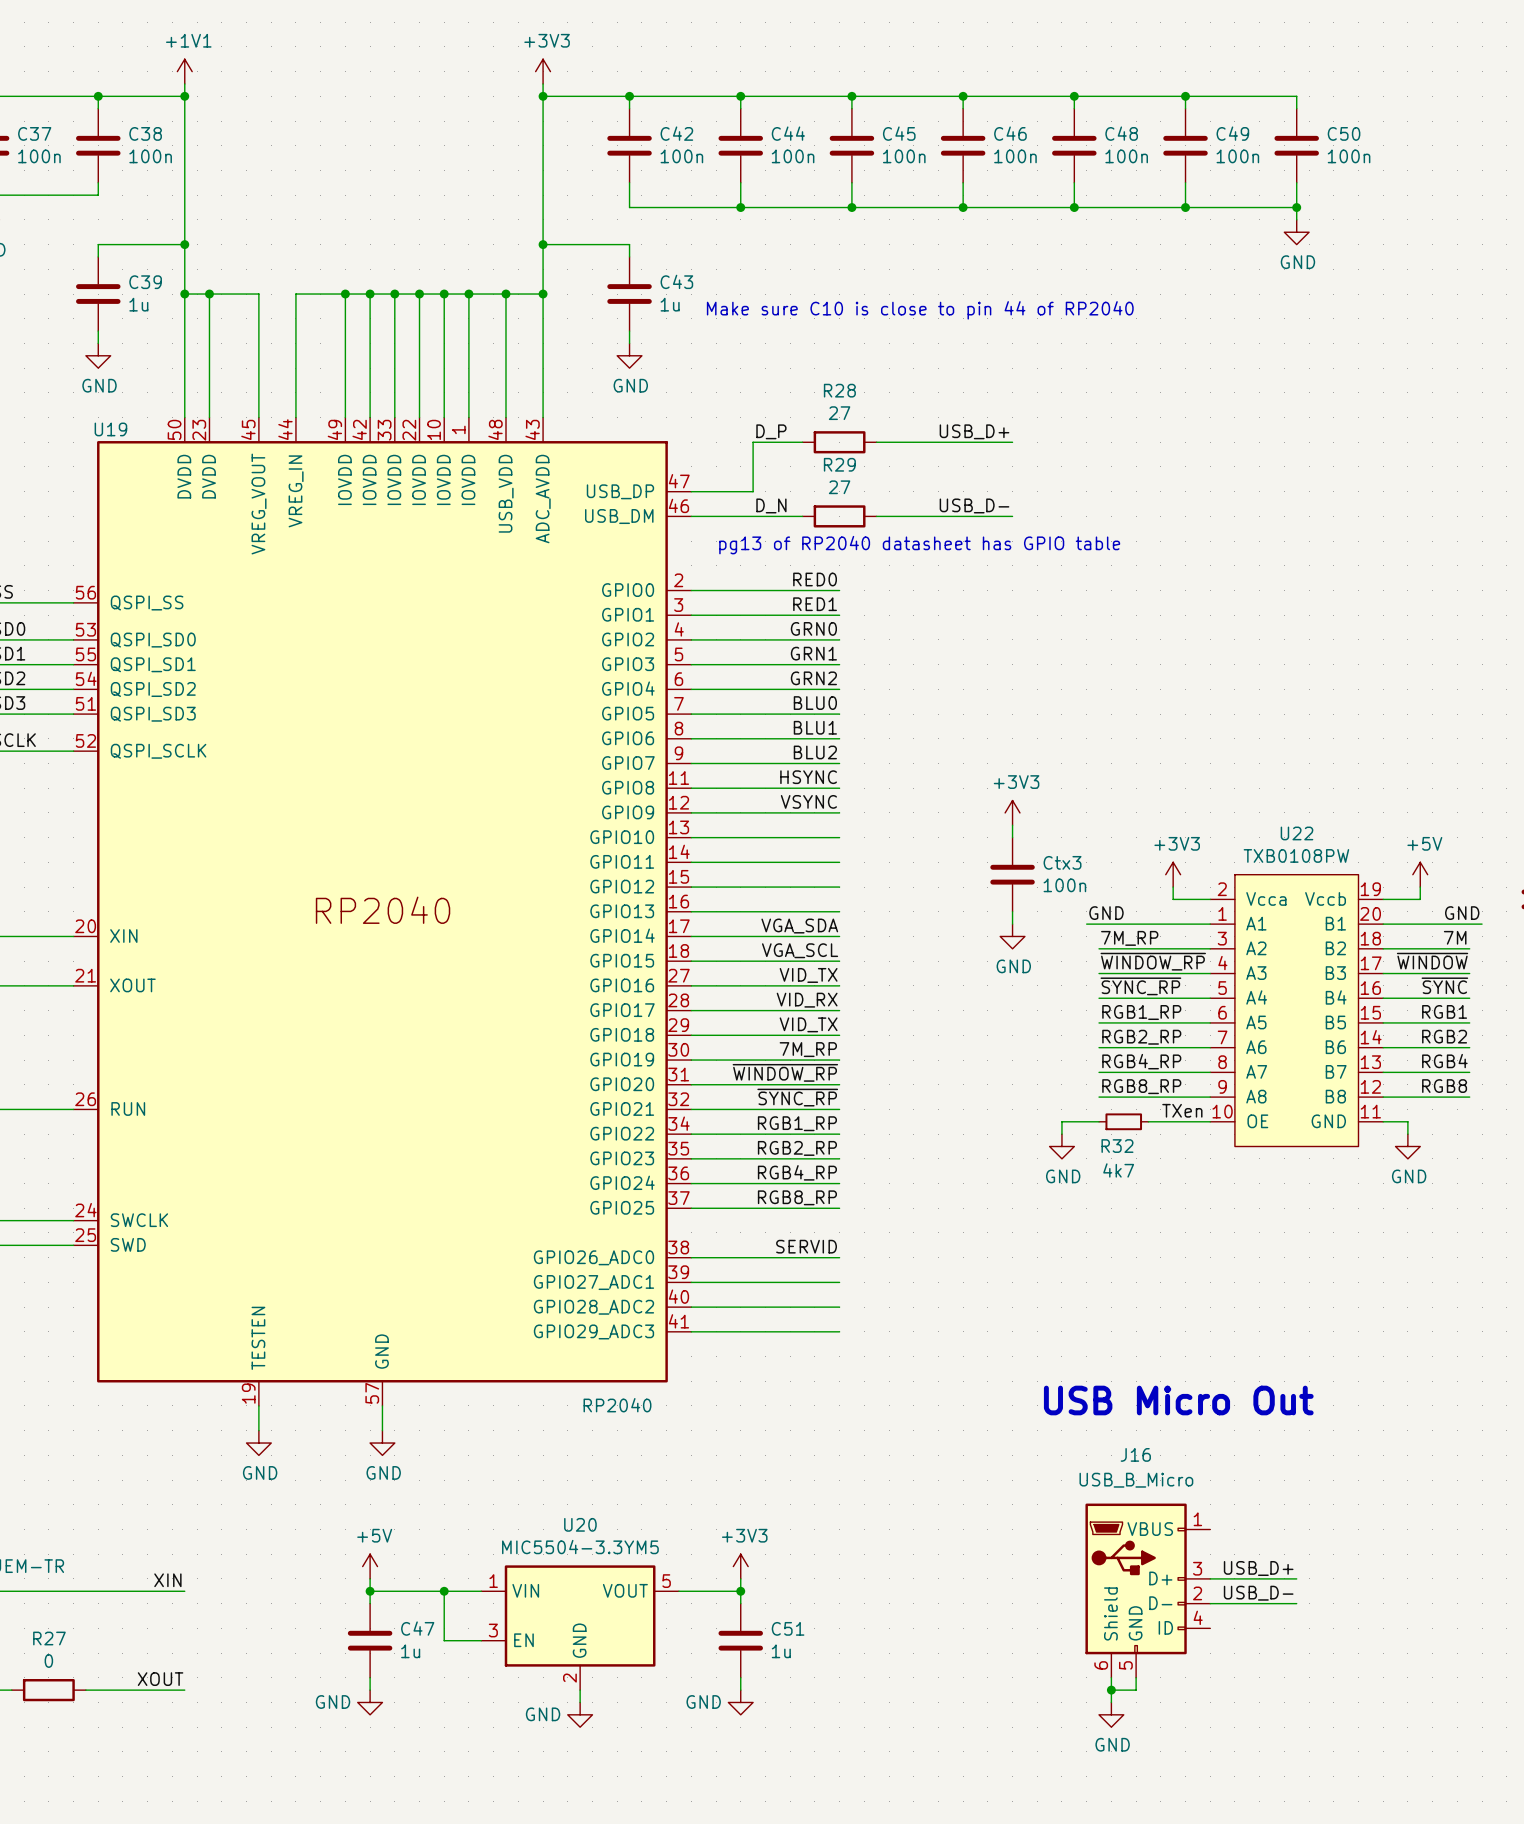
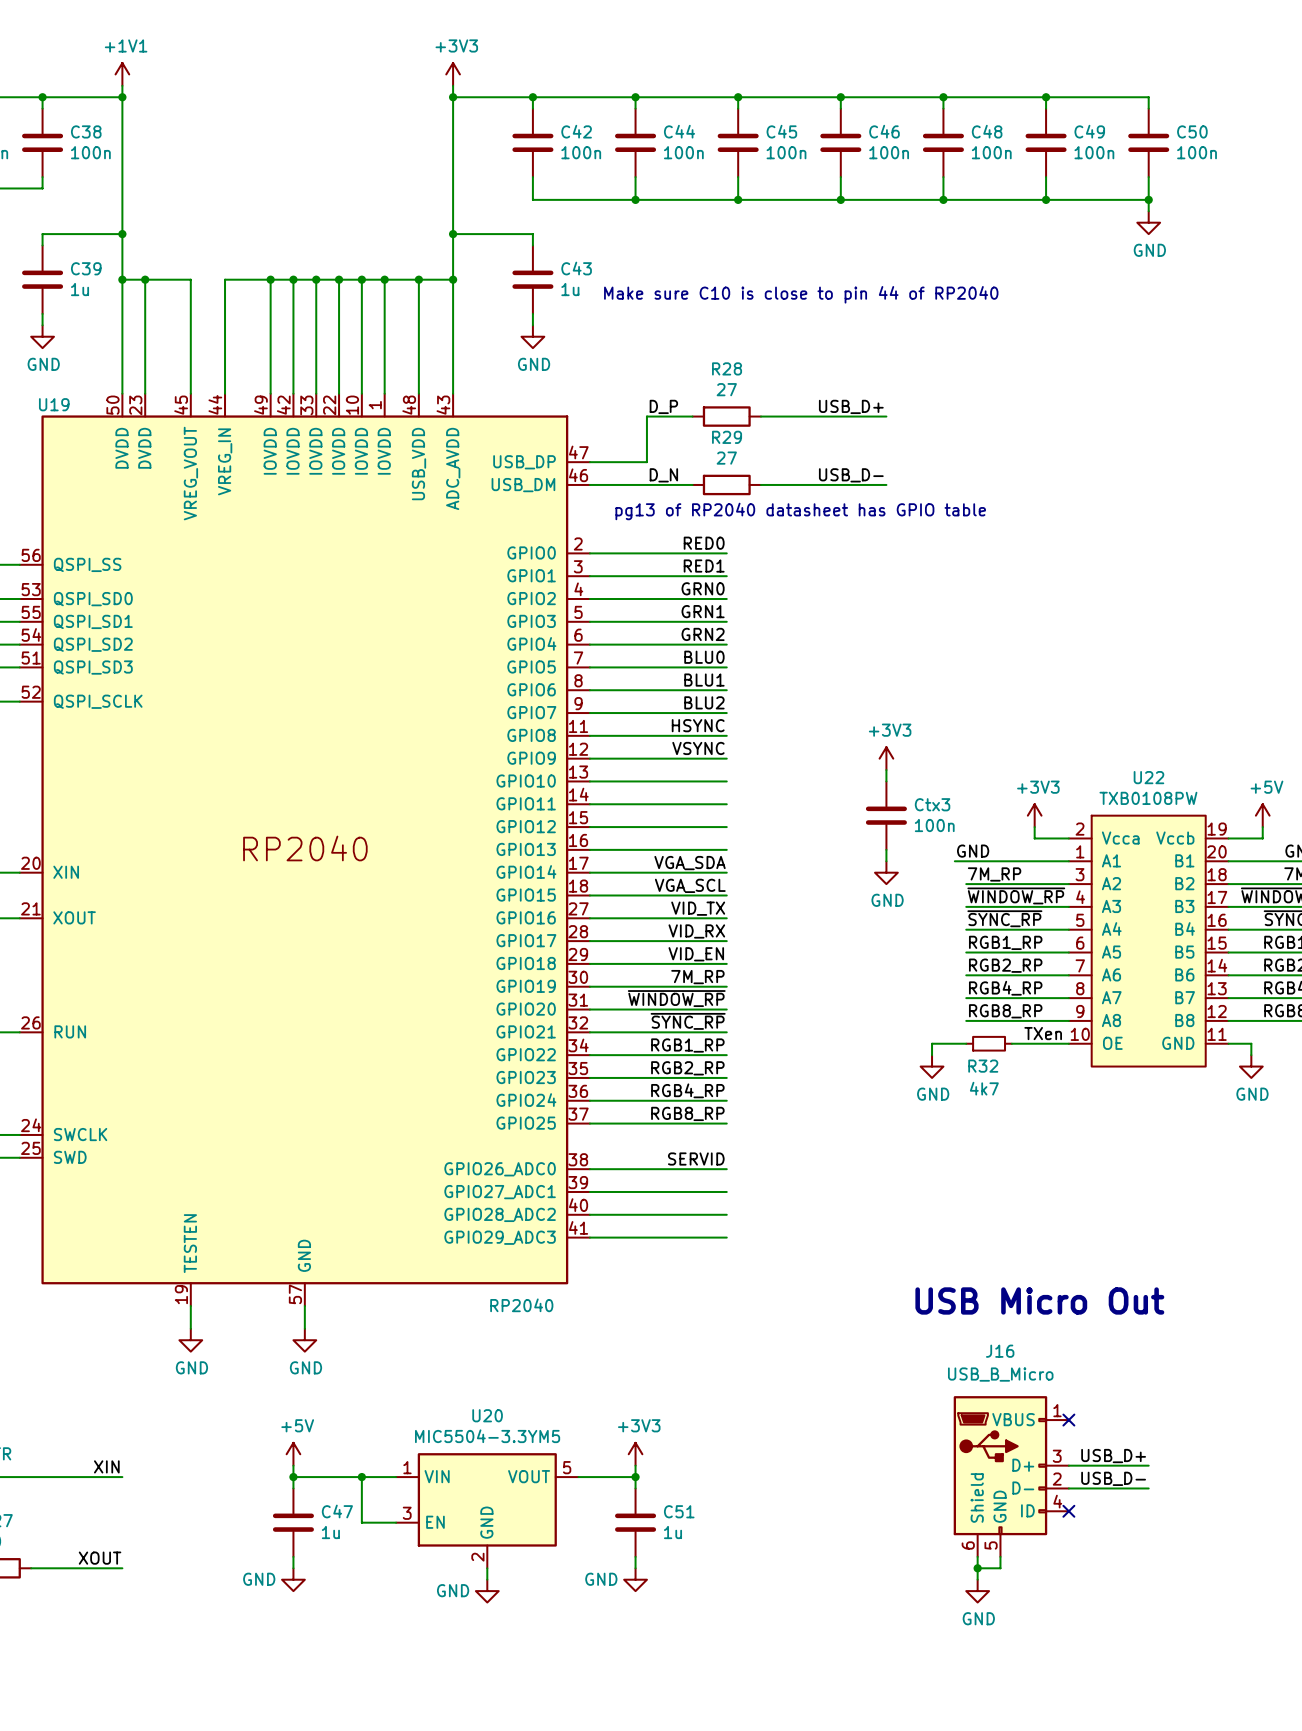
label: VID_TX (808, 1024) -> VID_EN (696, 954)
no-connect mark: none -> (1068, 1420)
no-connect mark: none -> (1068, 1511)

